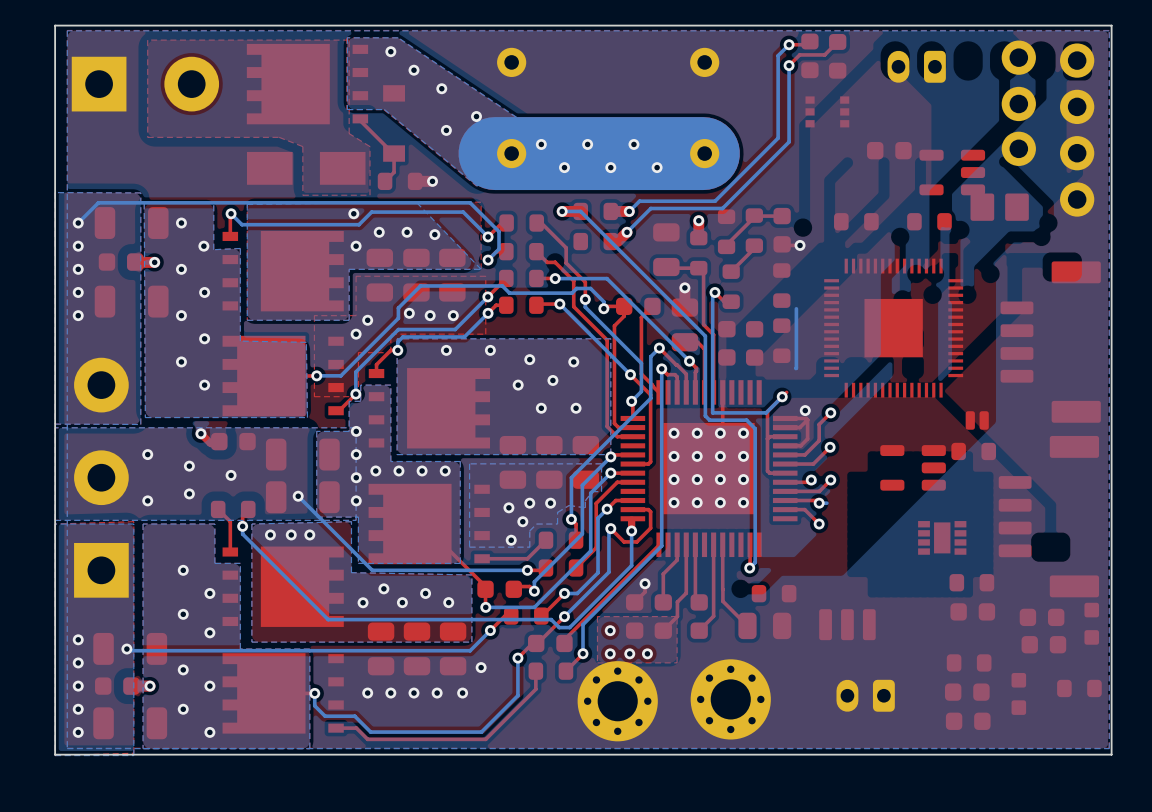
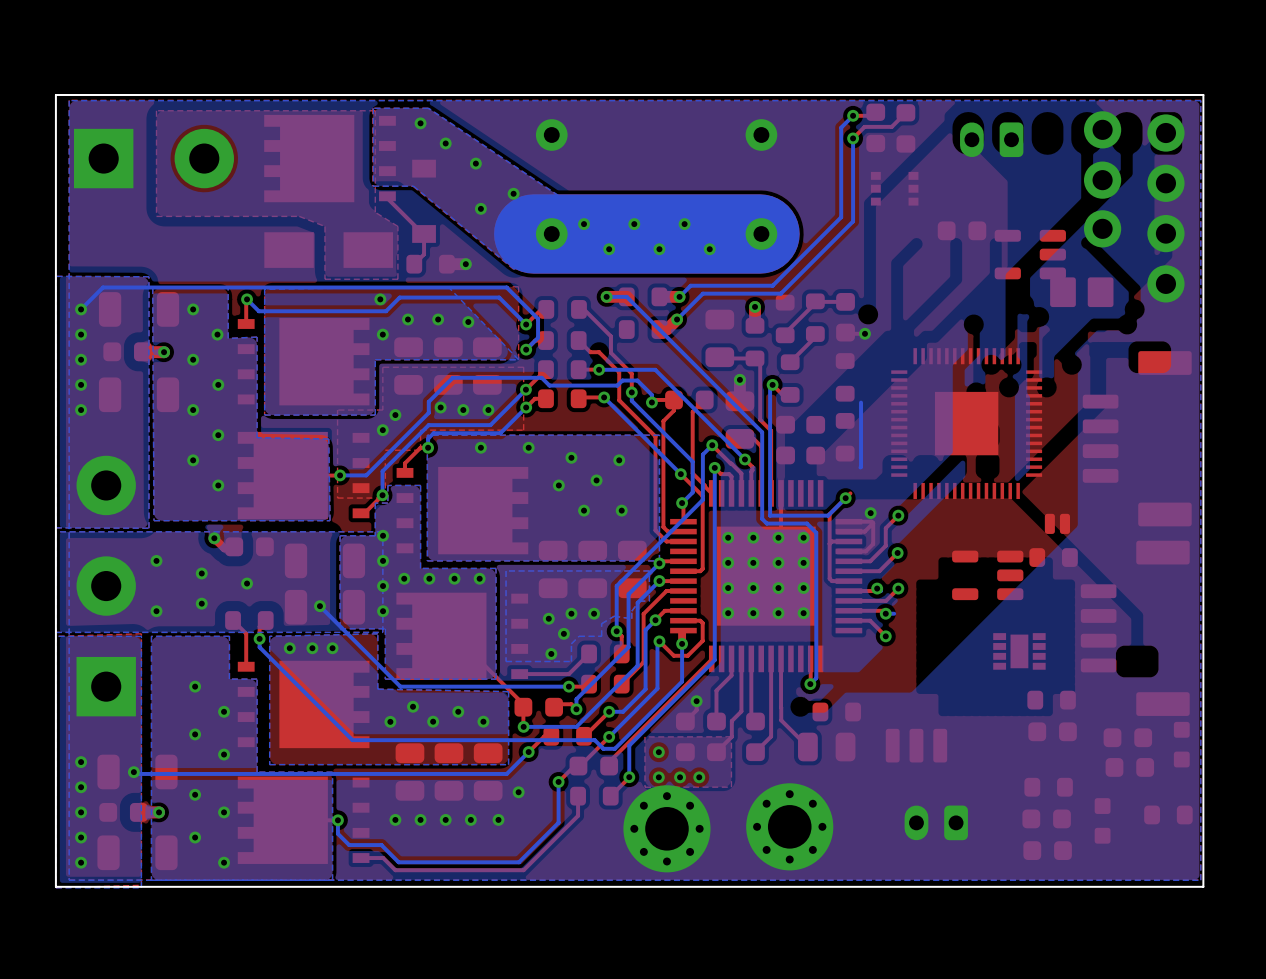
part: (856, 221) -> none
part: (929, 221) -> none

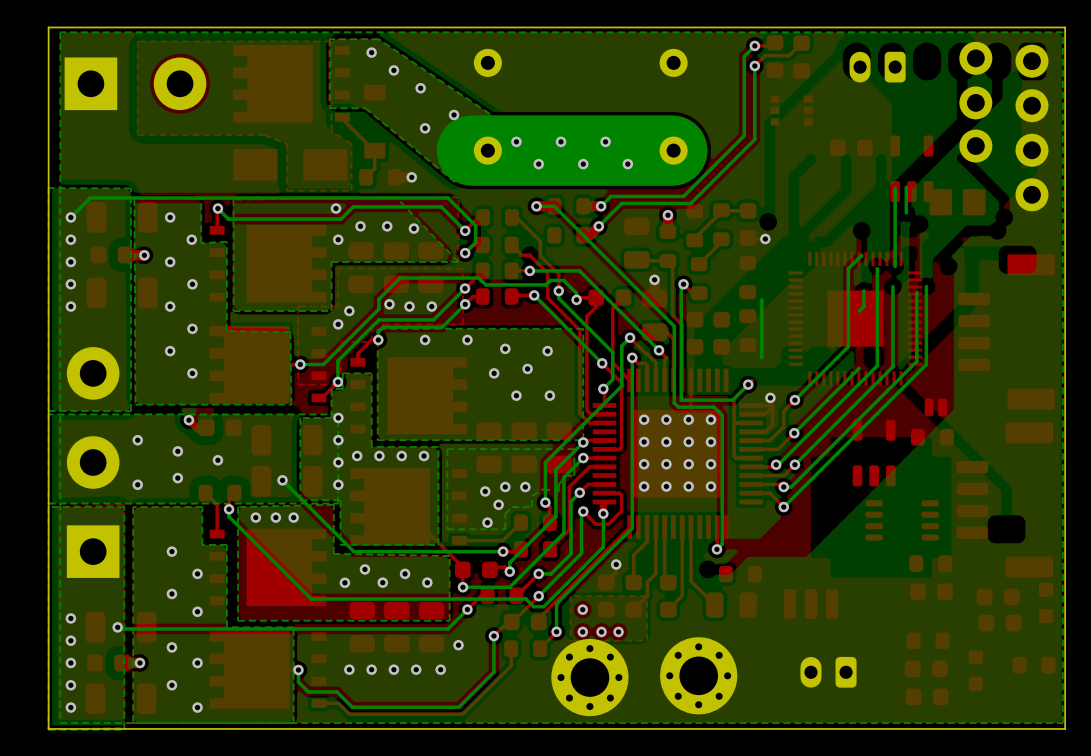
part footprint: [994, 229, 1066, 280] -> [890, 135, 934, 203]
bottom track: none -> (906, 187) (906, 212)
bottom track: none -> (895, 188) (895, 266)
bottom track: none -> (861, 255) (848, 268) (848, 346) (794, 400)
bottom track: none -> (877, 268) (877, 365) (776, 466)
bottom track: none -> (892, 286) (892, 366) (794, 464)
bottom track: none -> (926, 286) (926, 364) (783, 507)
bottom track: none -> (863, 290) (863, 306) (859, 311)
bottom track: none -> (916, 292) (916, 361) (791, 487)
bottom track: none -> (859, 368) (794, 433)
part footprint: [952, 550, 1024, 601] -> [852, 419, 896, 487]
part footprint: [993, 633, 1046, 670] -> [865, 500, 940, 541]

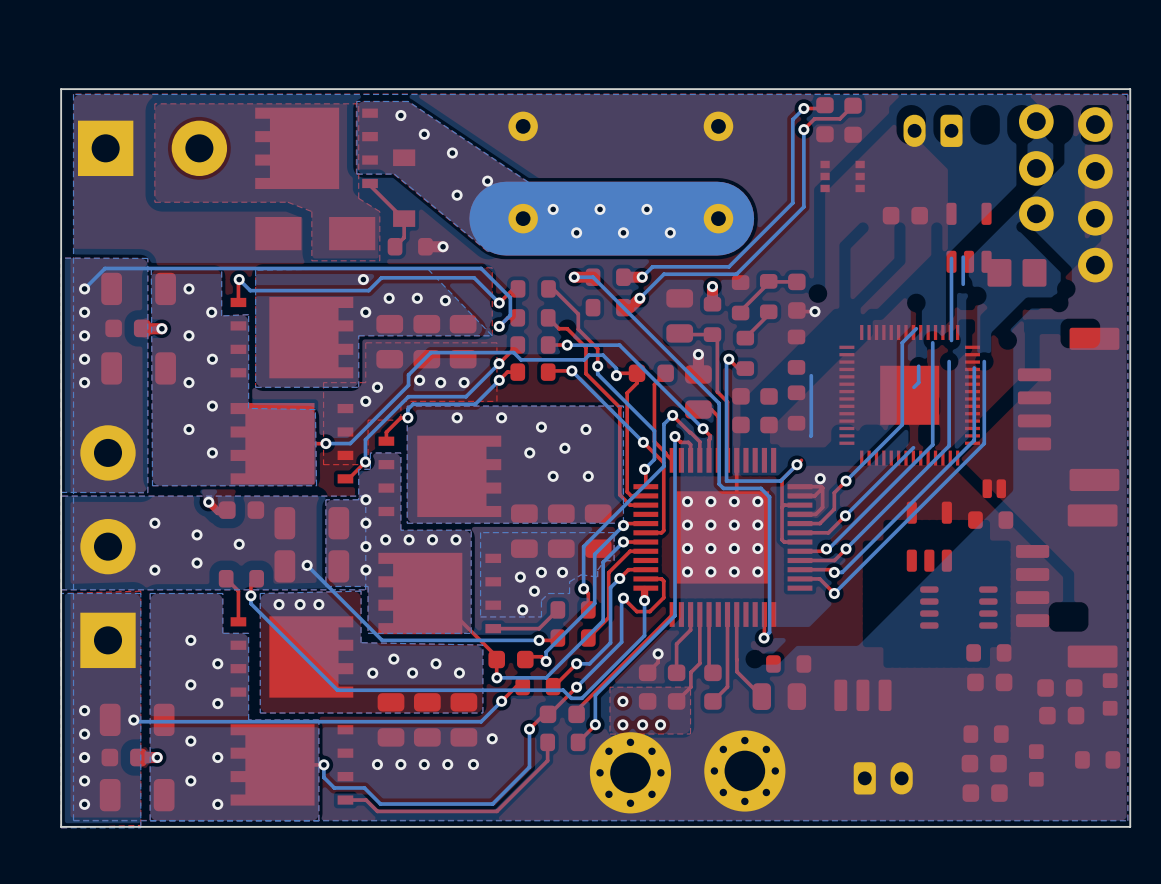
part rotation: 0° (828, 672) -> 180° (883, 778)

